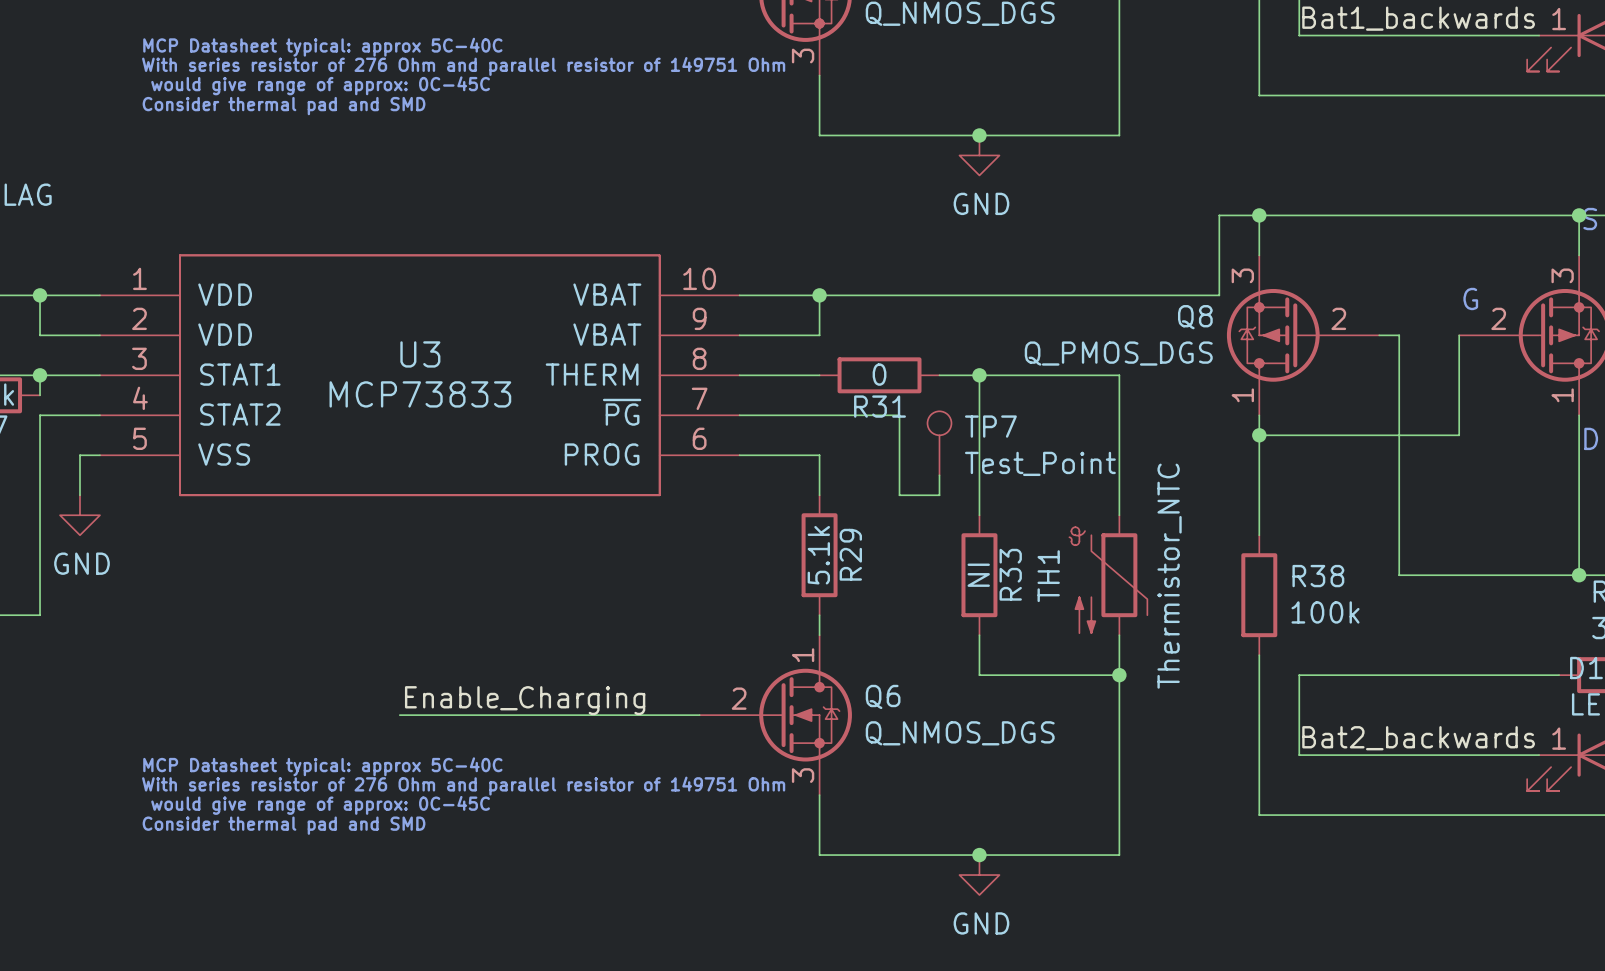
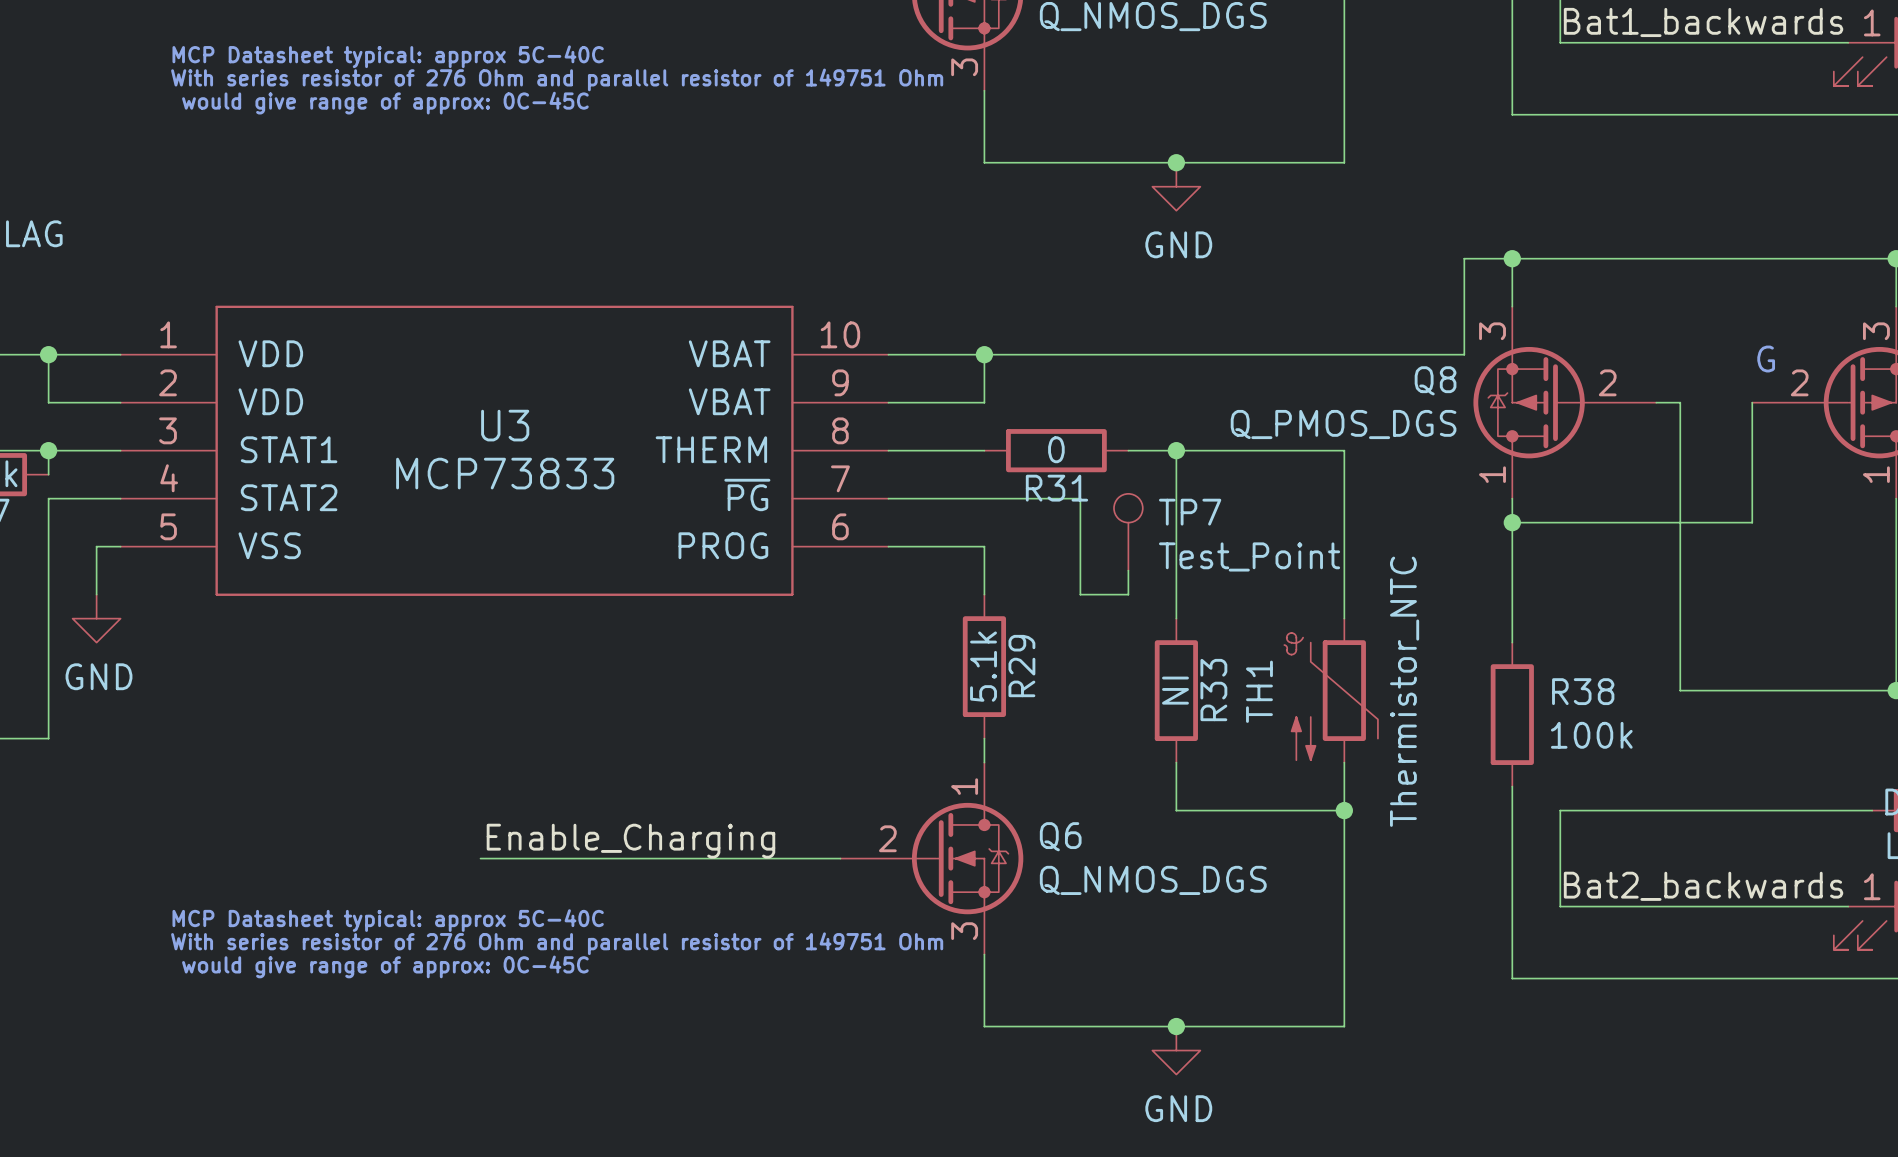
text: Consider thermal pad and SMD (284, 106) -> none
text: Consider thermal pad and SMD (284, 825) -> none

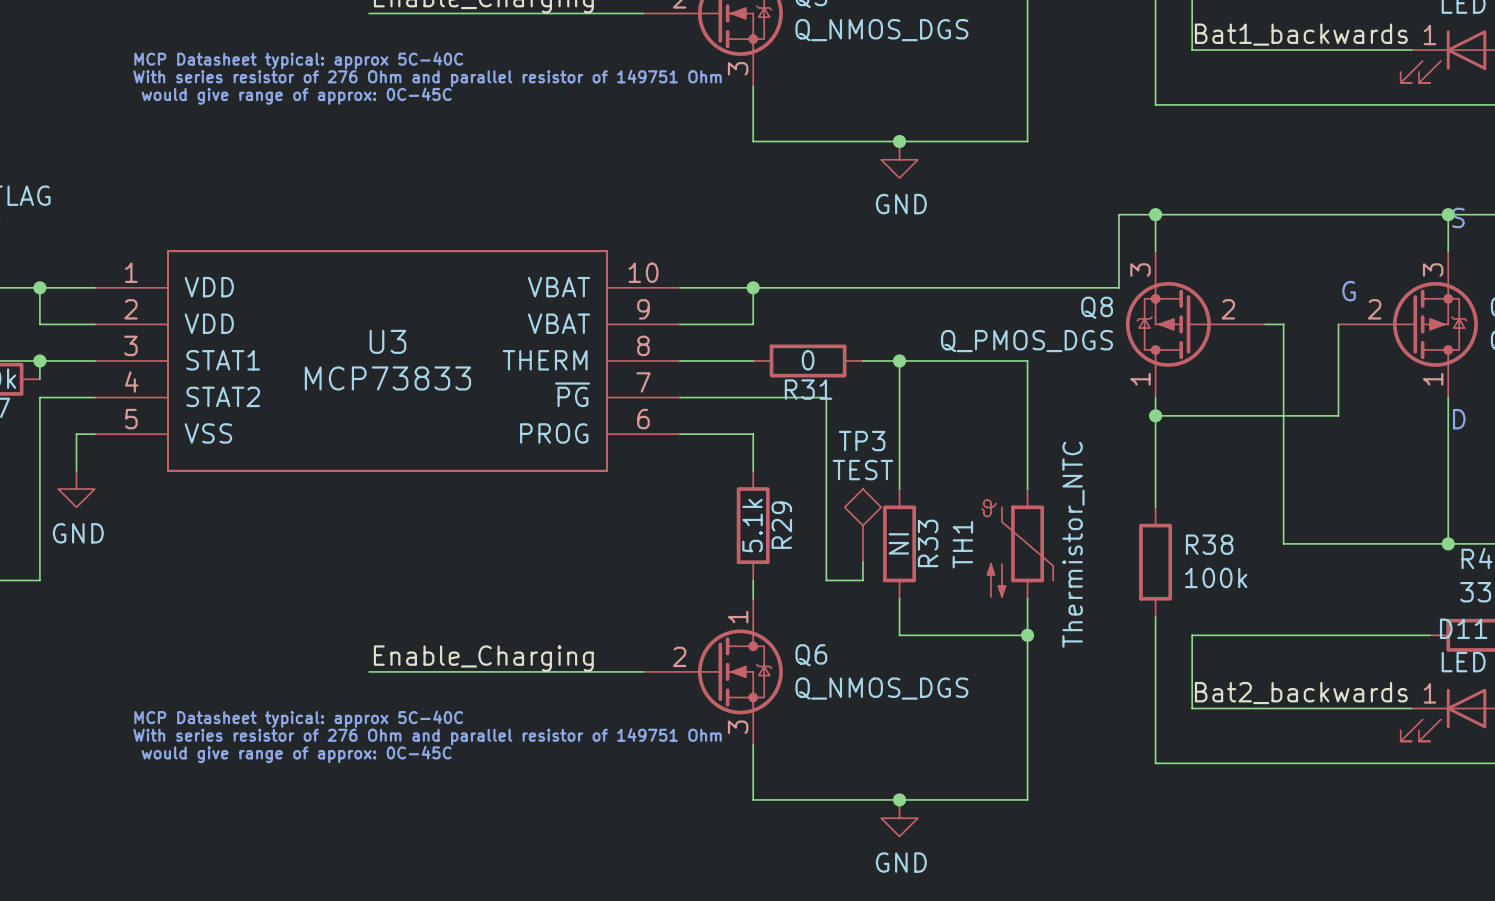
TP7: Test_Point (1128, 532) -> none
wire: (1128, 570) (1128, 594) (1080, 594) -> (862, 562) (862, 580) (826, 580) (826, 470)
TP3: none -> TEST (862, 525)

